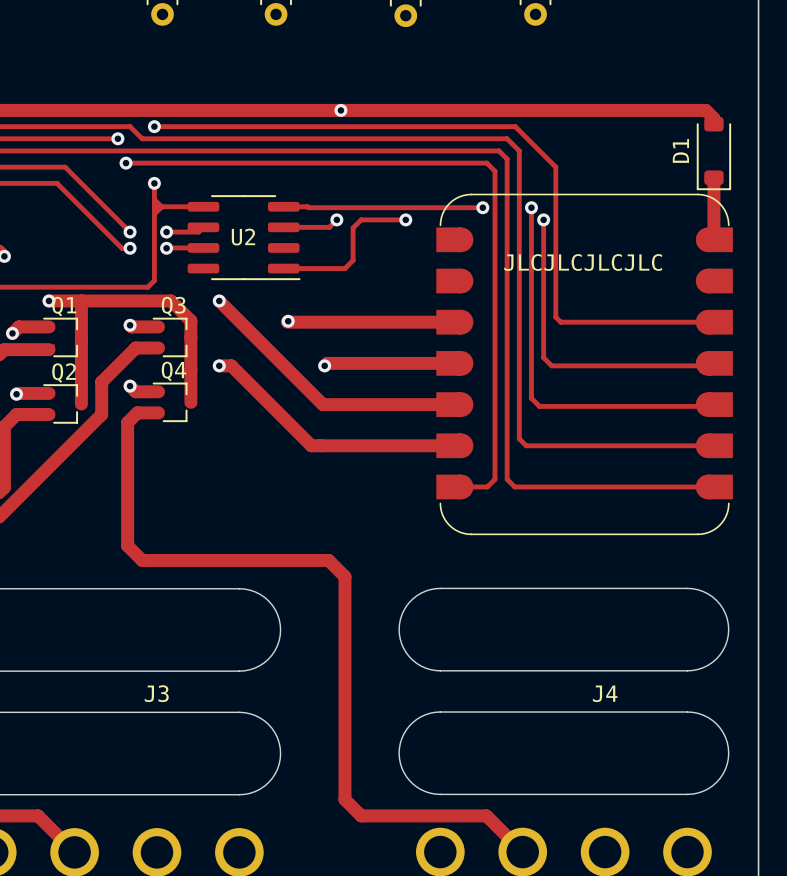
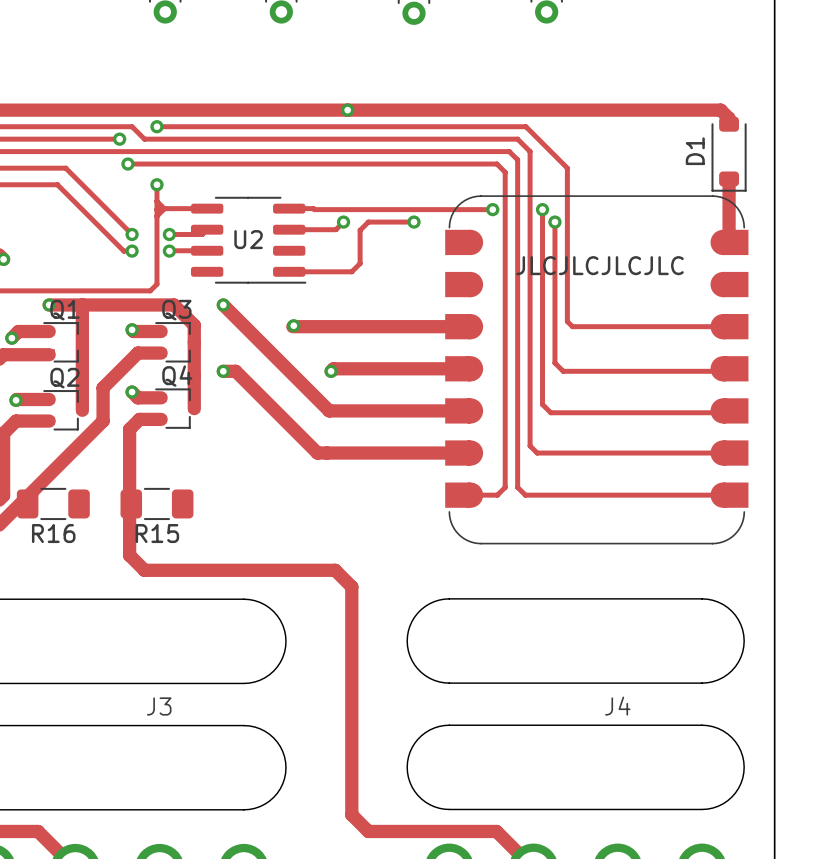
R16: none -> (53, 503)
R15: none -> (156, 503)

